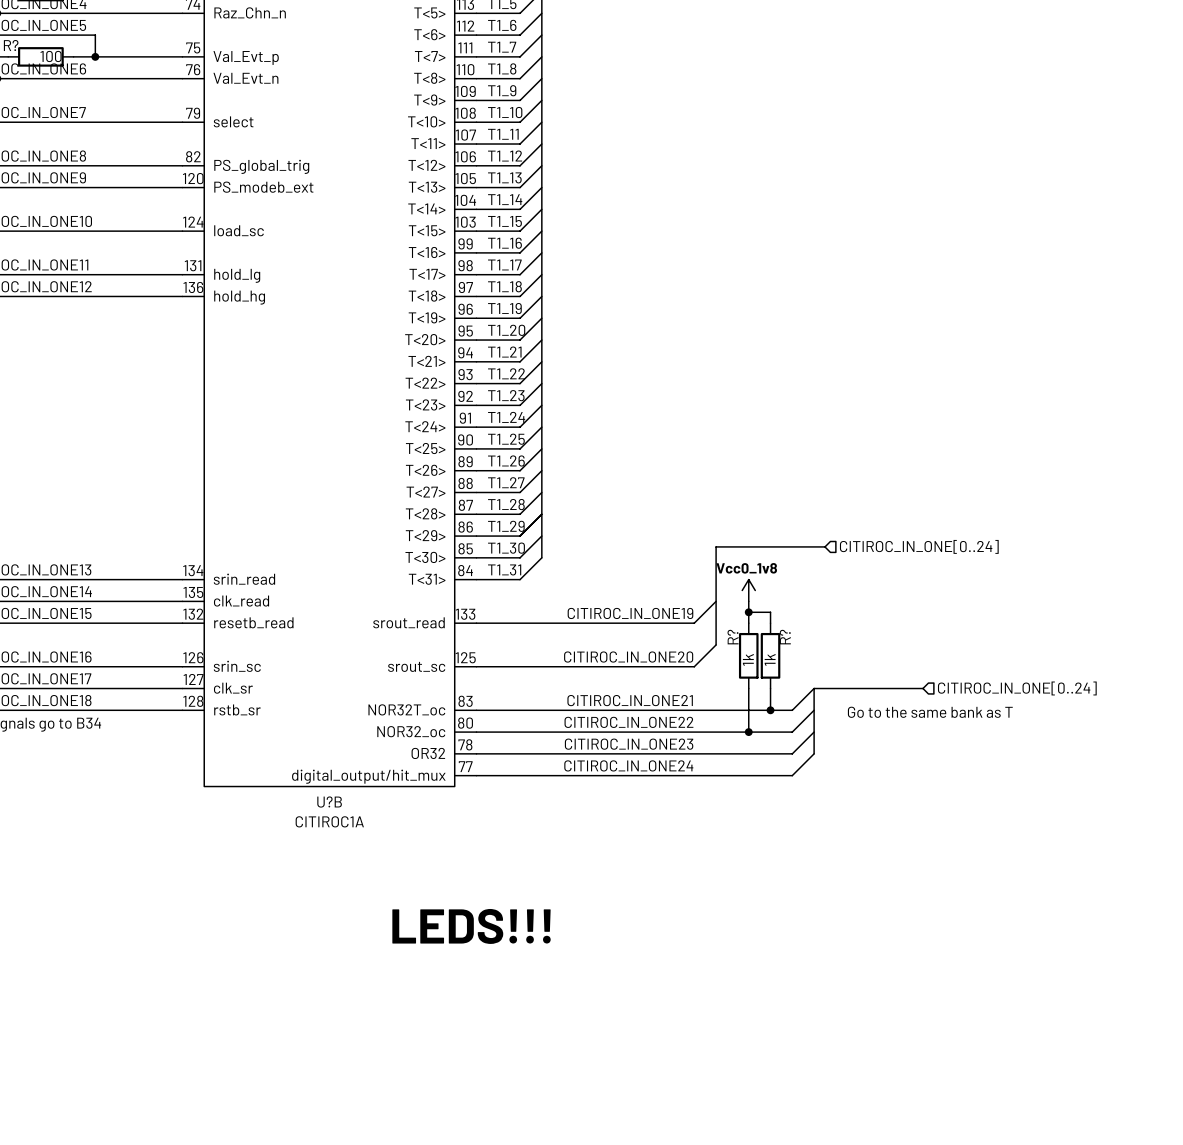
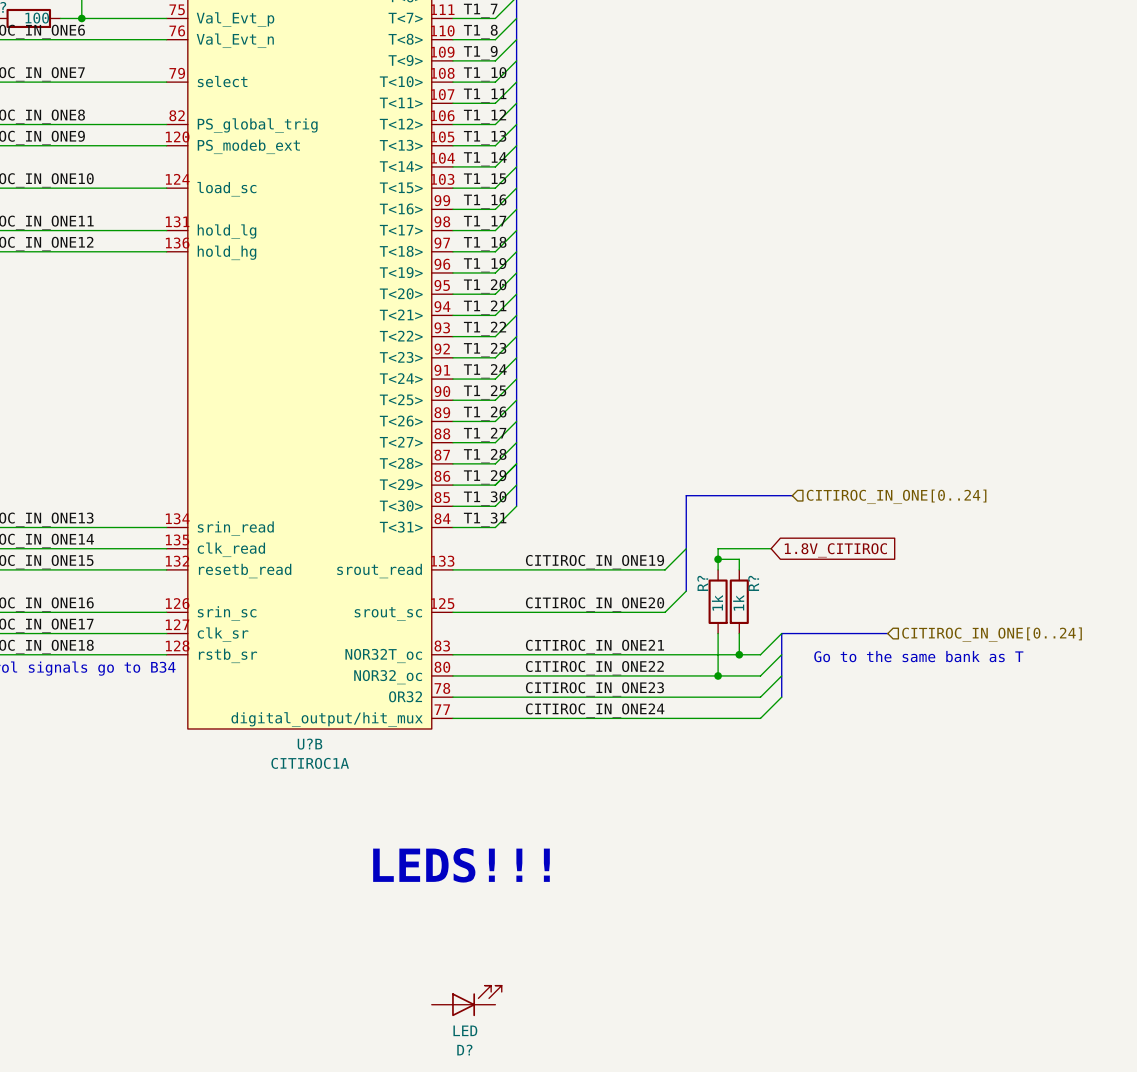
part: Vcc0_1v8 (748, 590) -> none
wire: none -> (718, 548) (771, 548)
global label: none -> 1.8V_CITIROC (835, 550)
D?: none -> LED (466, 1000)

